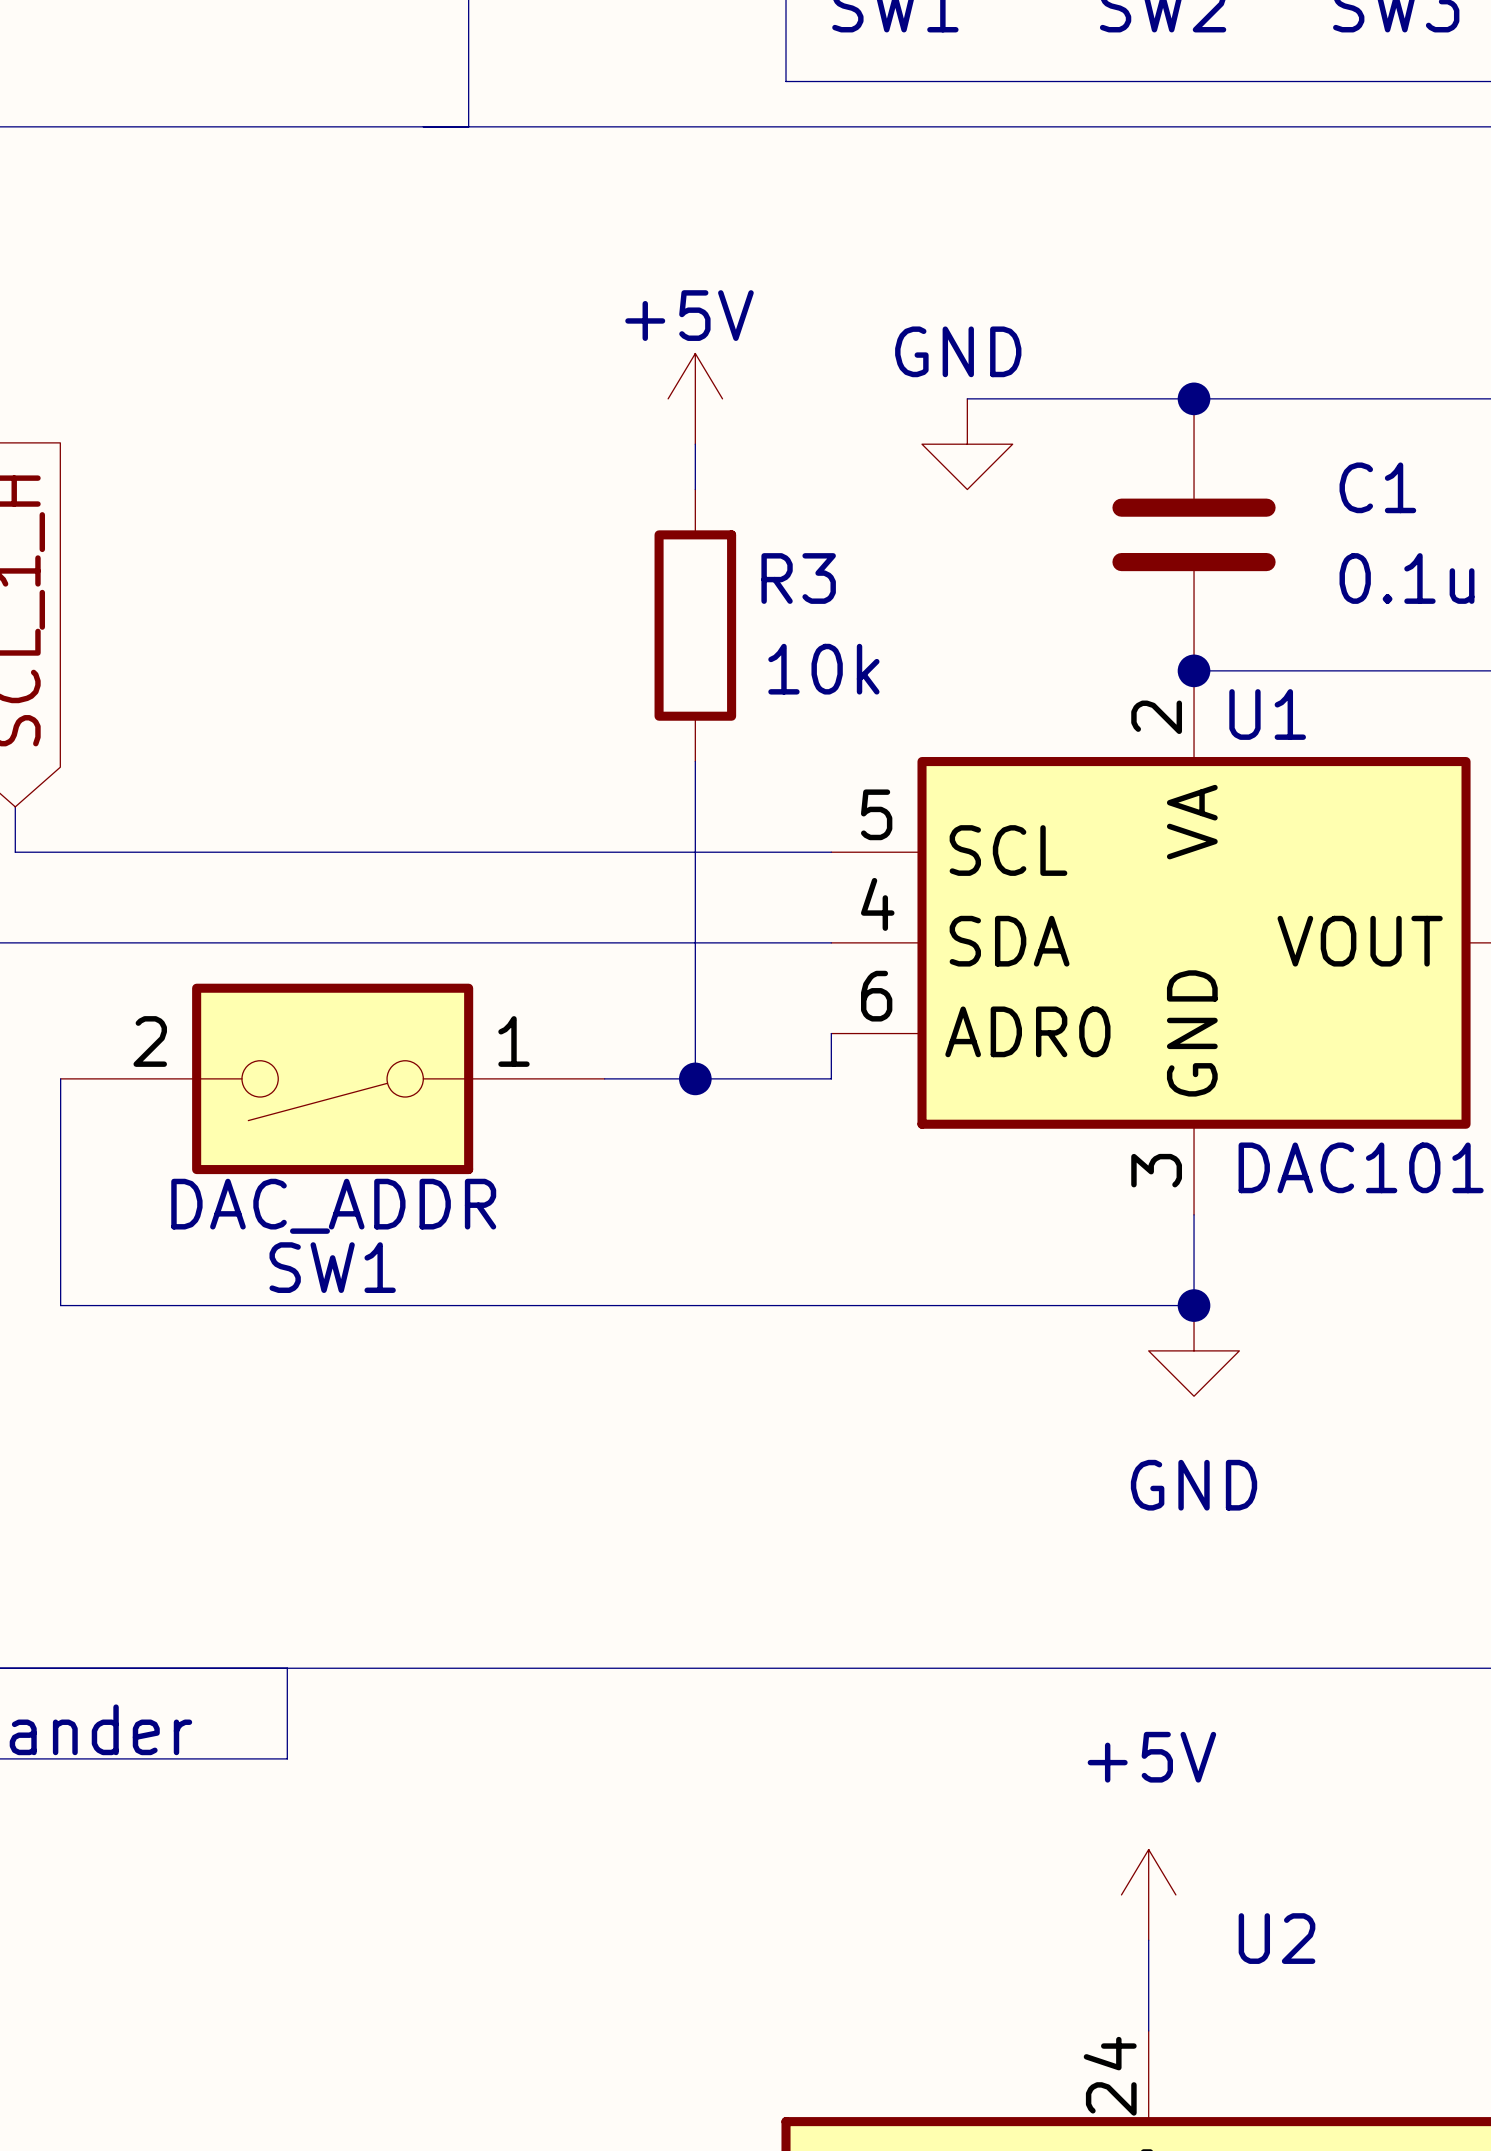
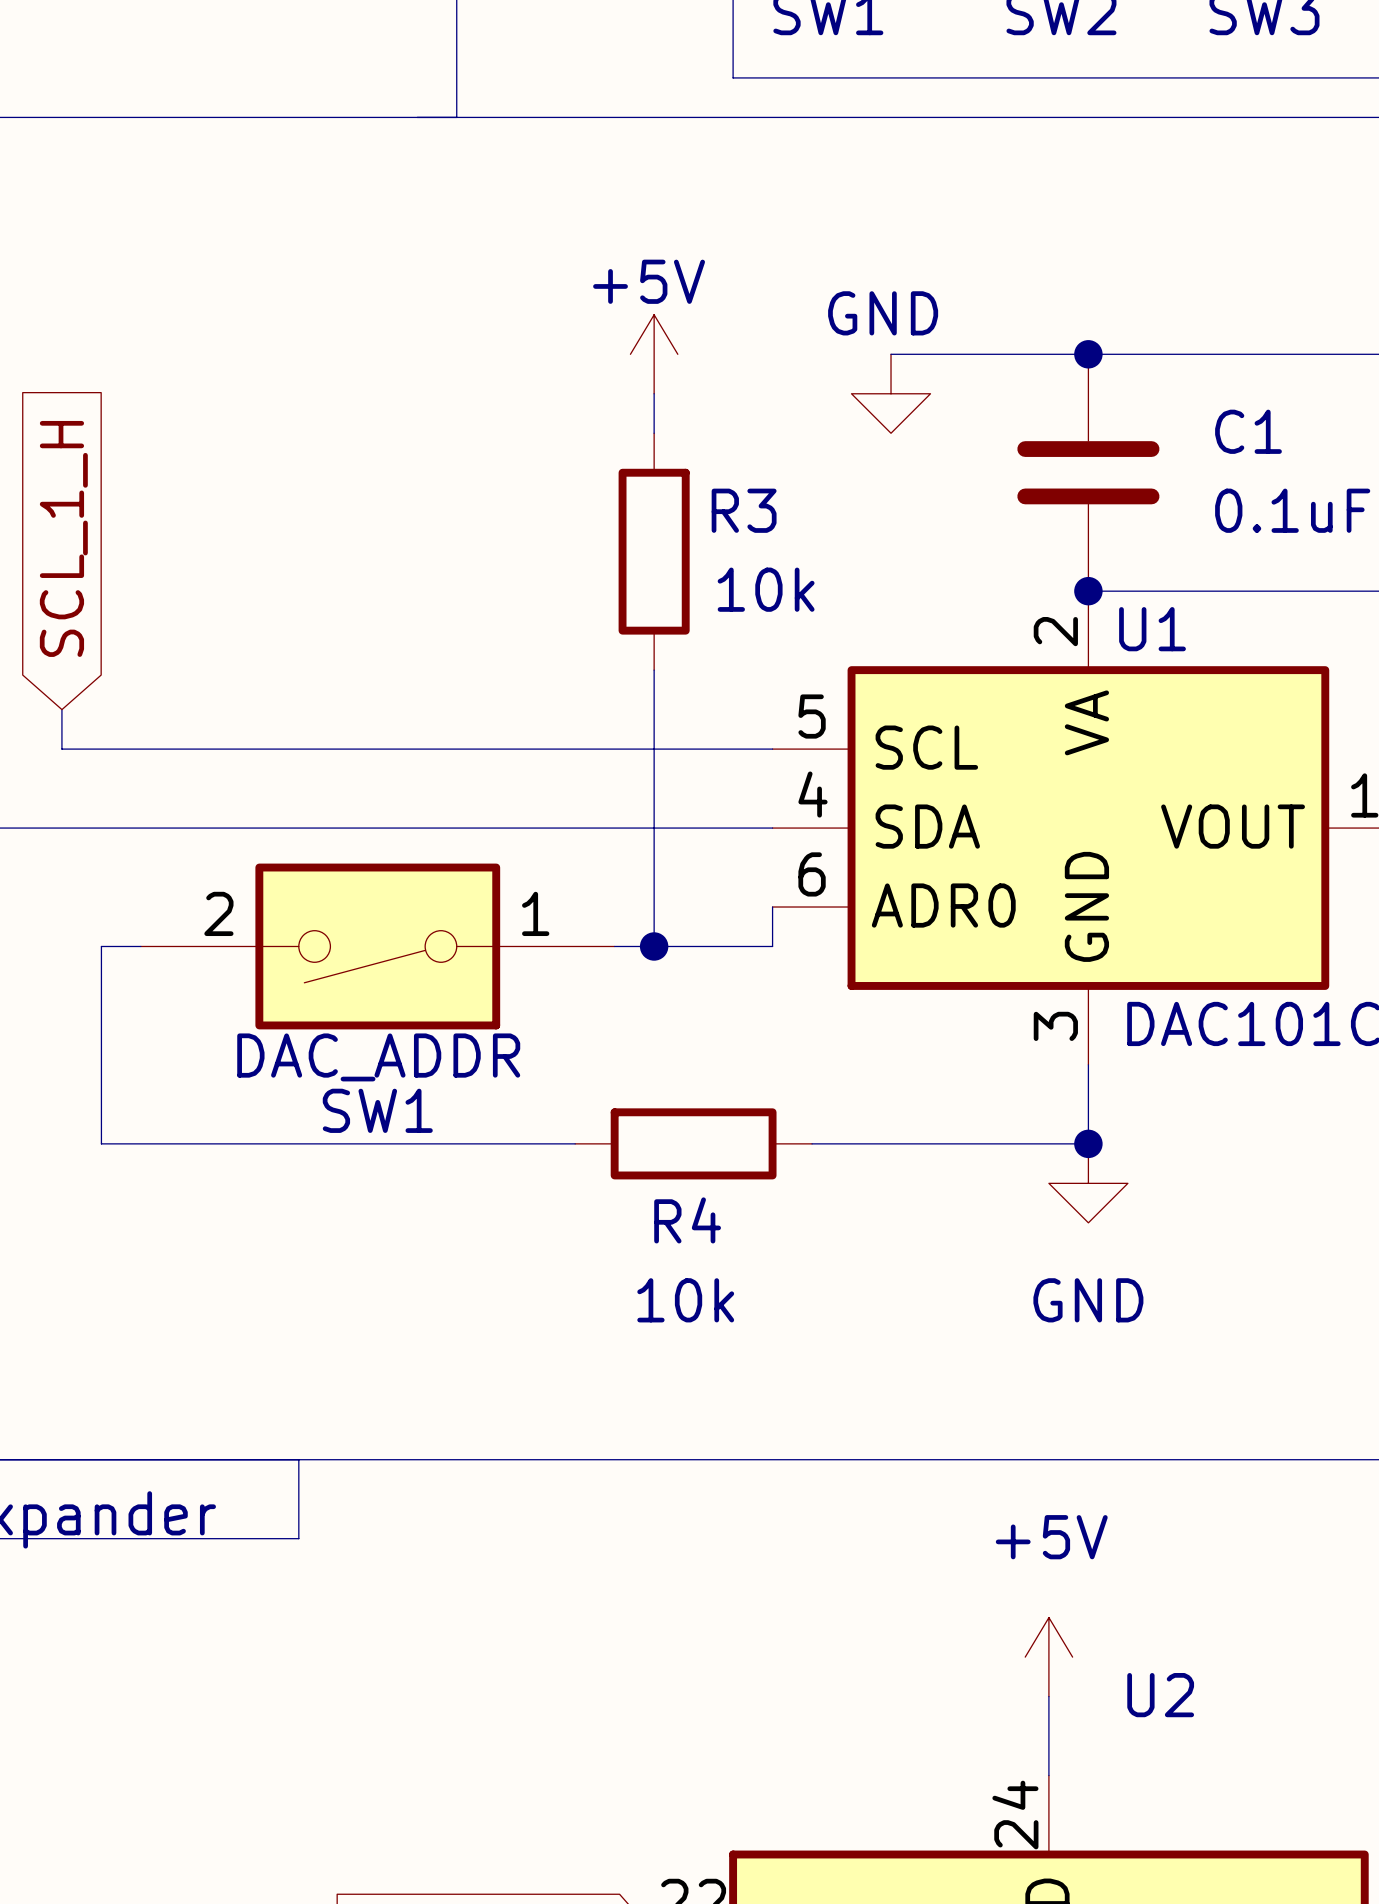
SW1 position: (332, 1078) -> (377, 946)
wire: (604, 1305) (876, 1305) -> none
R4: none -> 10k (693, 1143)

